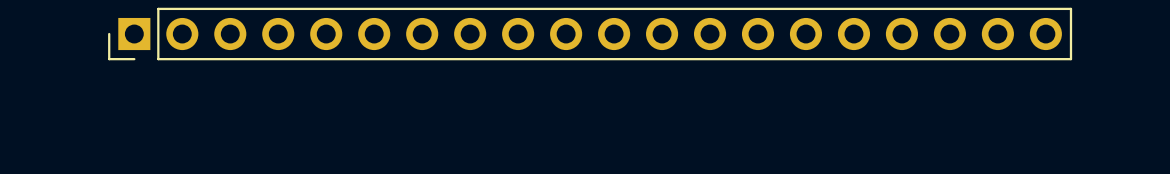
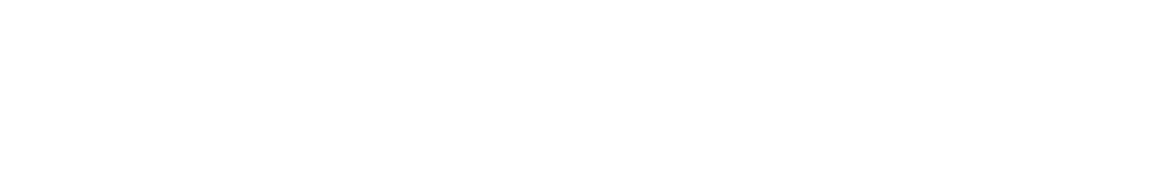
part: (590, 34) -> none

